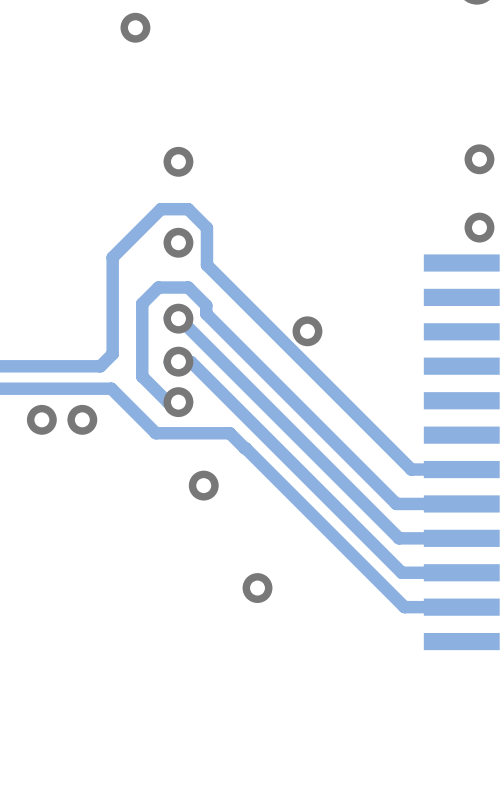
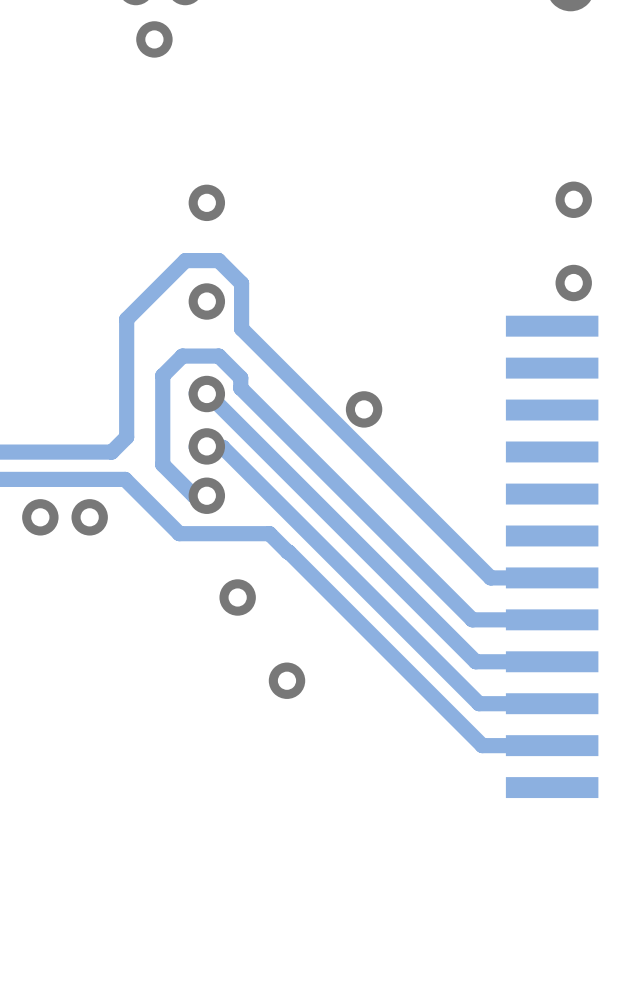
via position: (257, 588) -> (286, 680)

